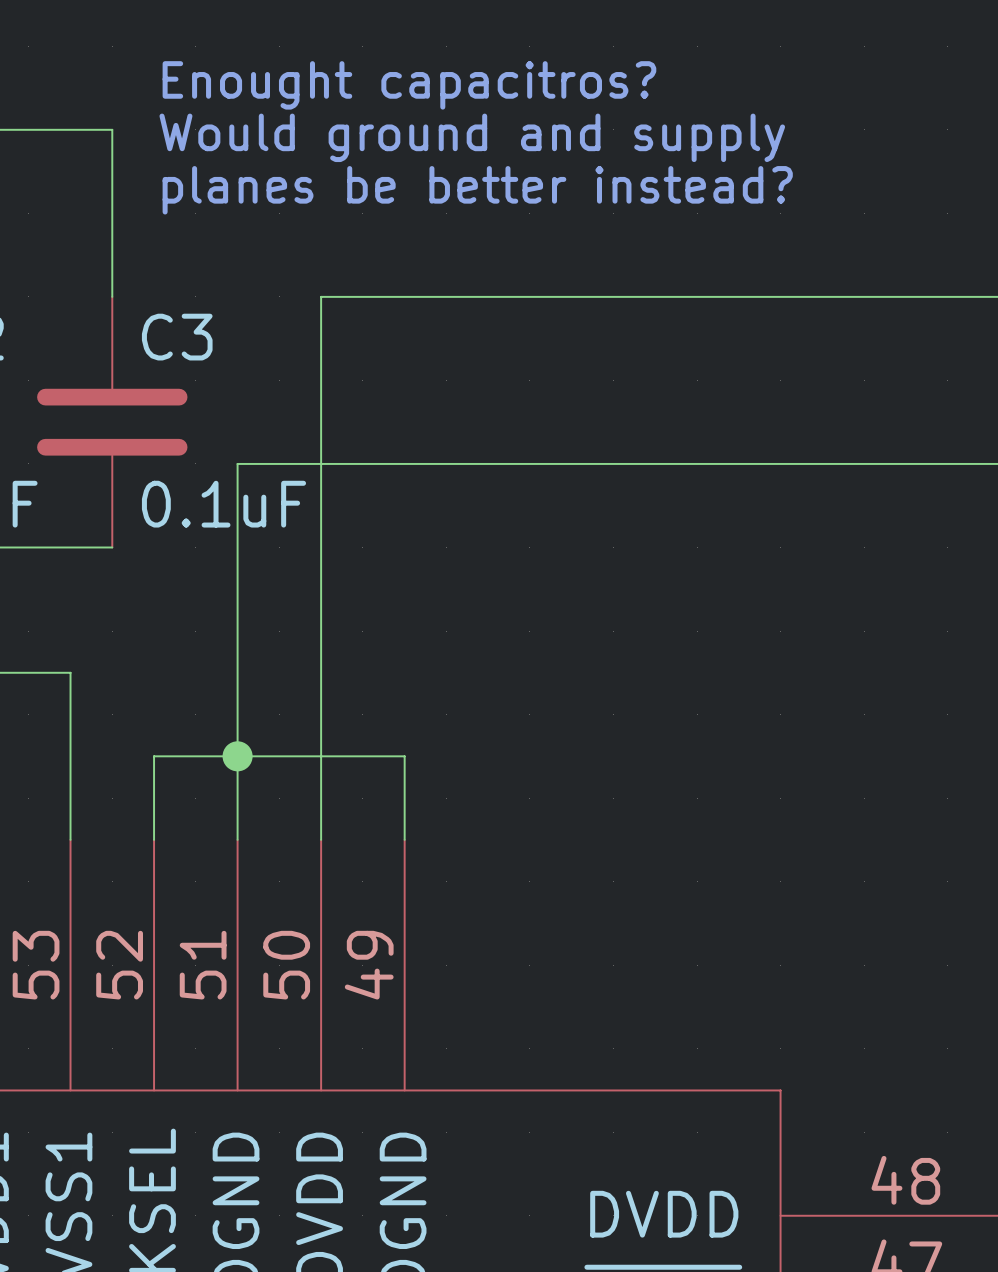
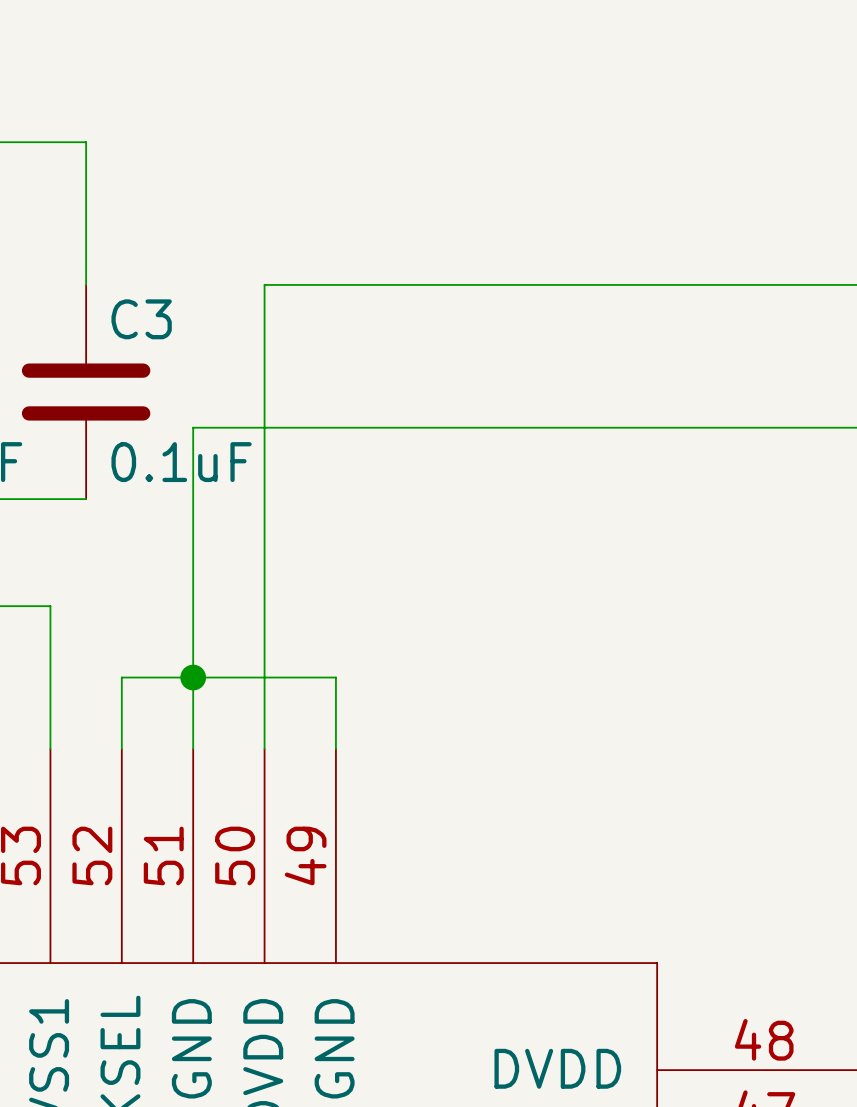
text: Enought capacitros? (409, 85) -> none
text: Would ground and supply (472, 137) -> none
text: planes be better instead? (477, 190) -> none

